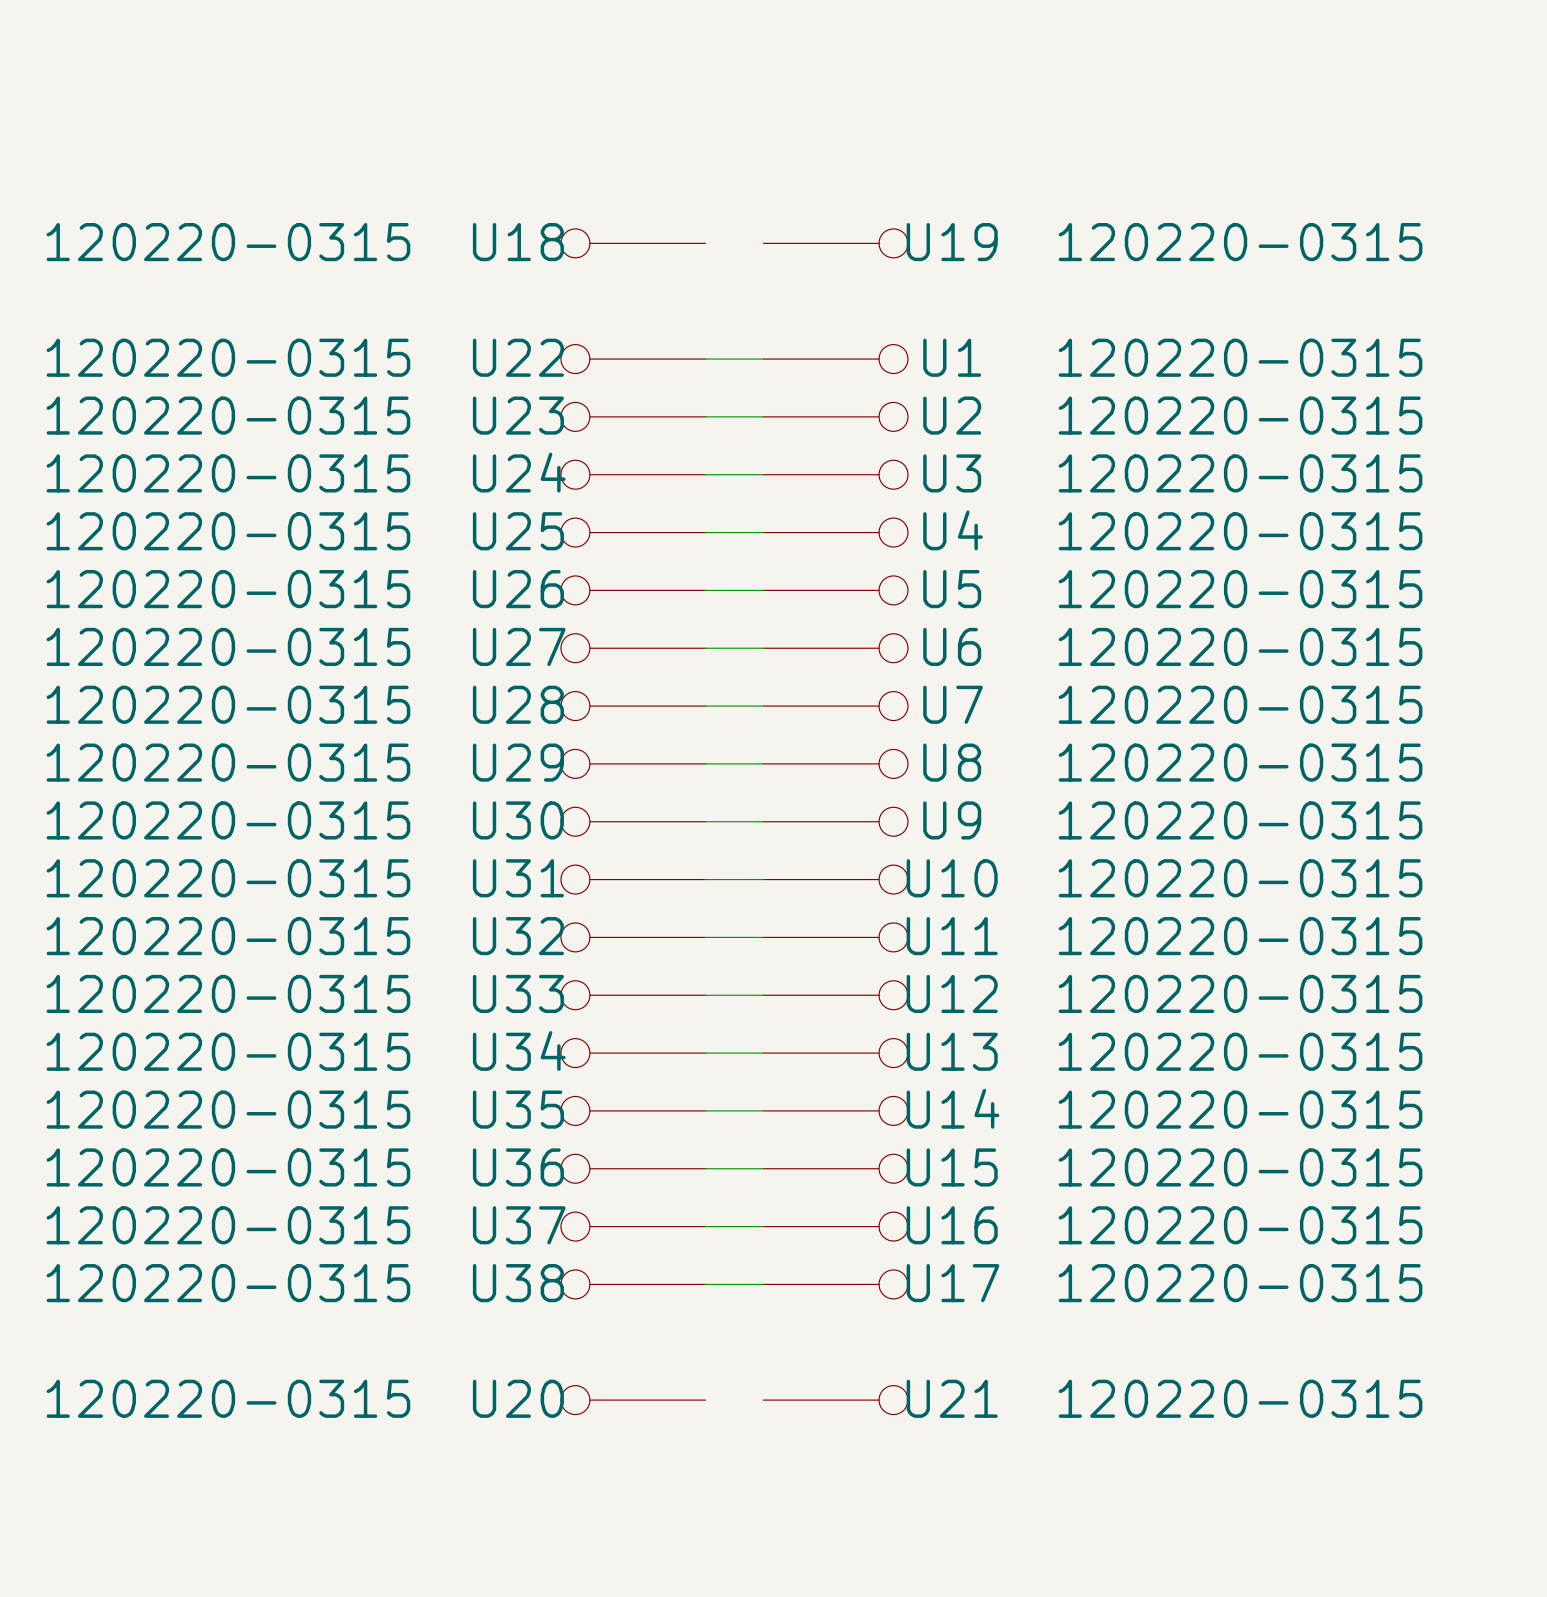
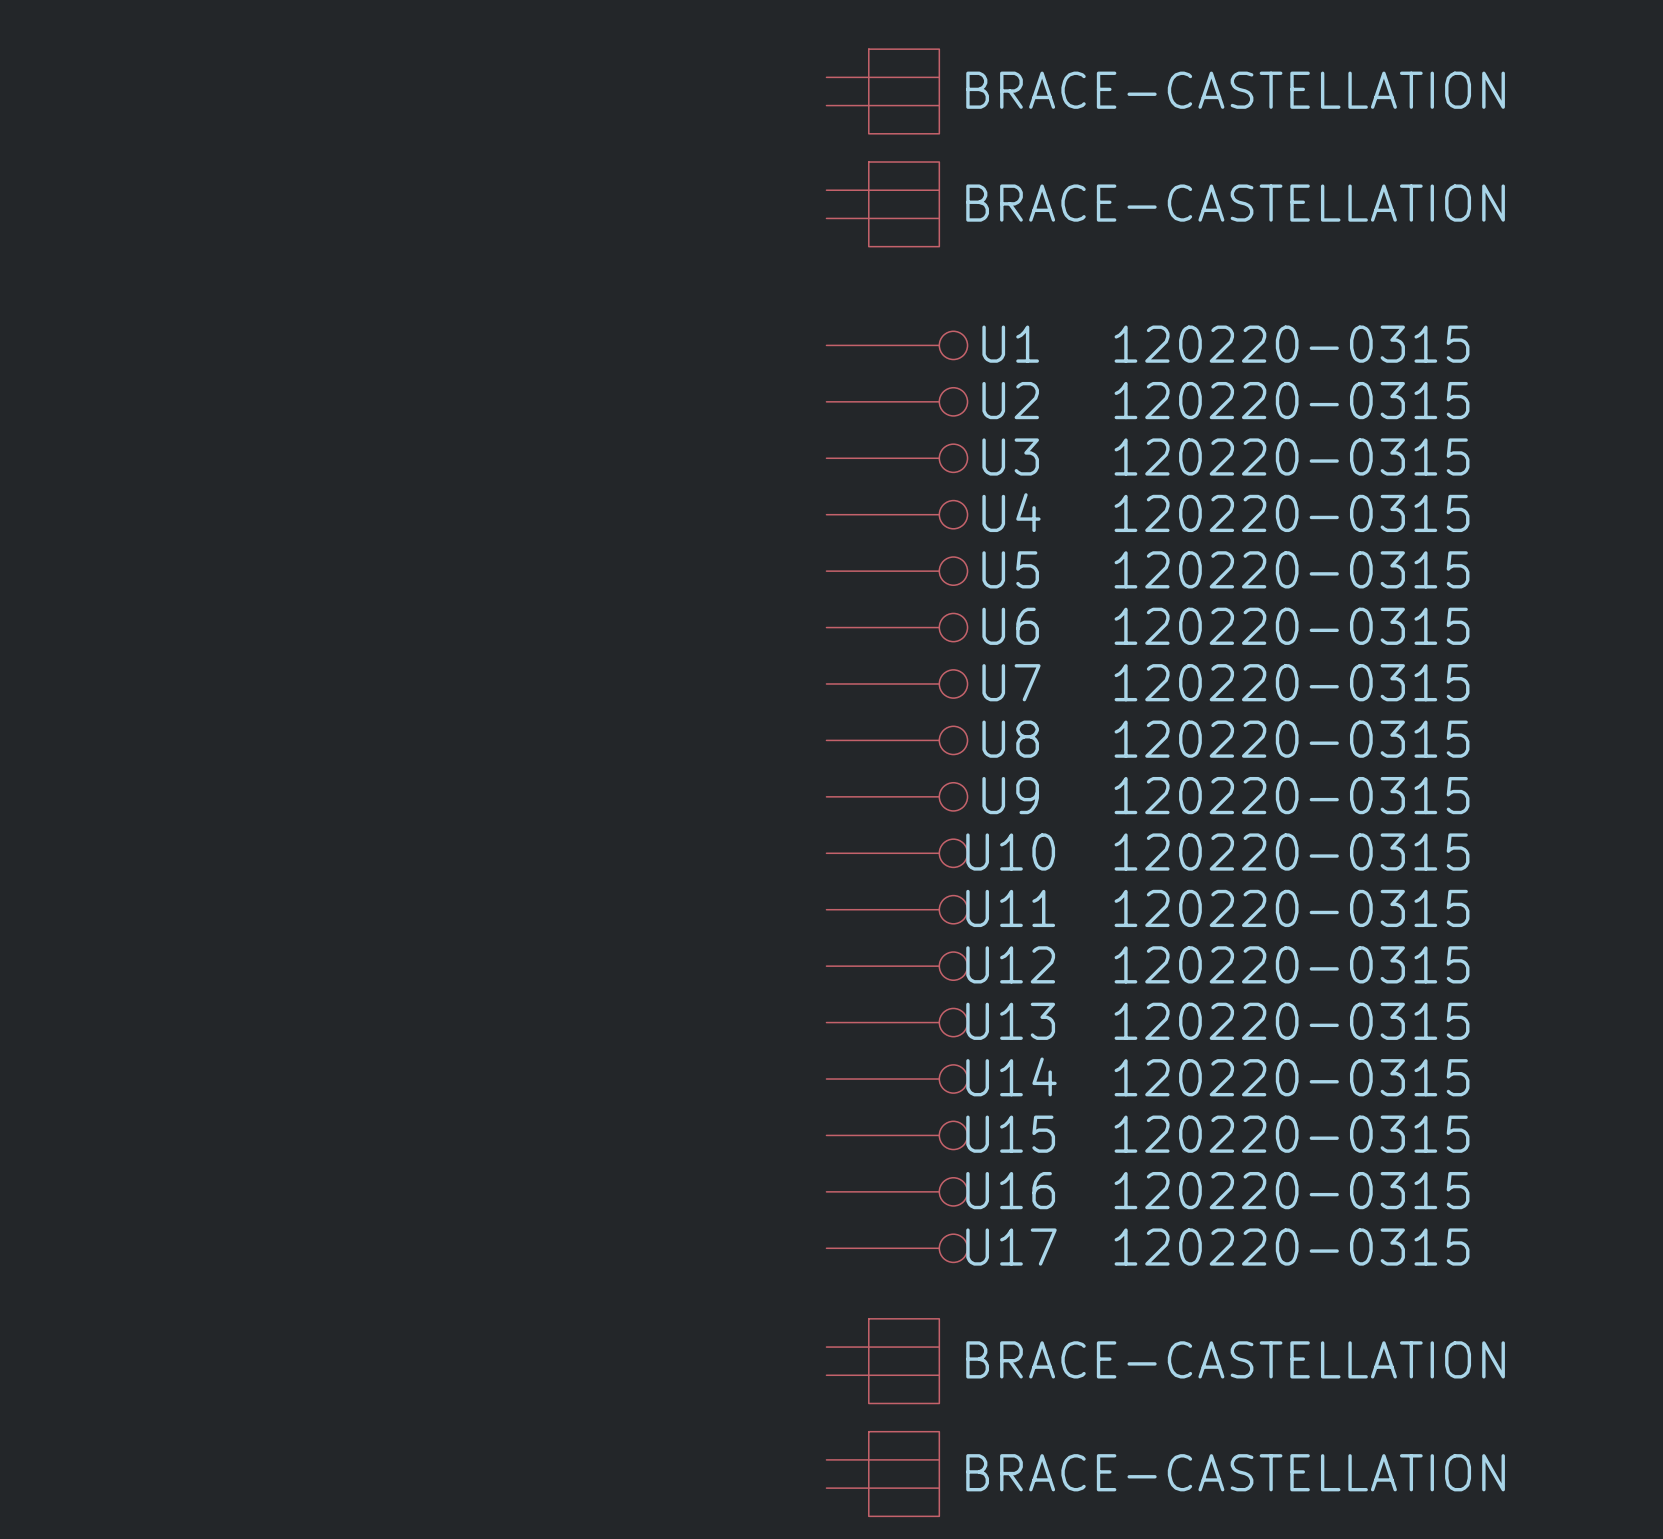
part: none -> BRACE-CASTELLATION (882, 91)
part: none -> BRACE-CASTELLATION (882, 204)
U18: 120220-0315 (633, 243) -> none
U19: 120220-0315 (835, 243) -> none
U22: 120220-0315 (633, 359) -> none
wire: (705, 359) (763, 359) -> none
U23: 120220-0315 (633, 416) -> none
wire: (705, 416) (763, 416) -> none
U24: 120220-0315 (633, 474) -> none
wire: (705, 474) (763, 474) -> none
U25: 120220-0315 (633, 532) -> none
wire: (705, 532) (763, 532) -> none
U26: 120220-0315 (633, 590) -> none
wire: (705, 590) (763, 590) -> none
U27: 120220-0315 (633, 648) -> none
wire: (705, 648) (763, 648) -> none
U28: 120220-0315 (633, 706) -> none
wire: (705, 706) (763, 706) -> none
U29: 120220-0315 (633, 763) -> none
wire: (705, 763) (763, 763) -> none
U30: 120220-0315 (633, 821) -> none
wire: (705, 821) (763, 821) -> none
U31: 120220-0315 (633, 879) -> none
wire: (705, 879) (763, 879) -> none
U32: 120220-0315 (633, 937) -> none
wire: (705, 937) (763, 937) -> none
U33: 120220-0315 (633, 995) -> none
wire: (705, 995) (763, 995) -> none
U34: 120220-0315 (633, 1053) -> none
wire: (705, 1053) (763, 1053) -> none
U35: 120220-0315 (633, 1110) -> none
wire: (705, 1110) (763, 1110) -> none
U36: 120220-0315 (633, 1168) -> none
wire: (705, 1168) (763, 1168) -> none
U37: 120220-0315 (633, 1226) -> none
wire: (705, 1226) (763, 1226) -> none
U38: 120220-0315 (633, 1284) -> none
wire: (705, 1284) (763, 1284) -> none
U20: 120220-0315 (633, 1400) -> none
part: none -> BRACE-CASTELLATION (882, 1361)
U21: 120220-0315 (835, 1400) -> none
part: none -> BRACE-CASTELLATION (882, 1474)

